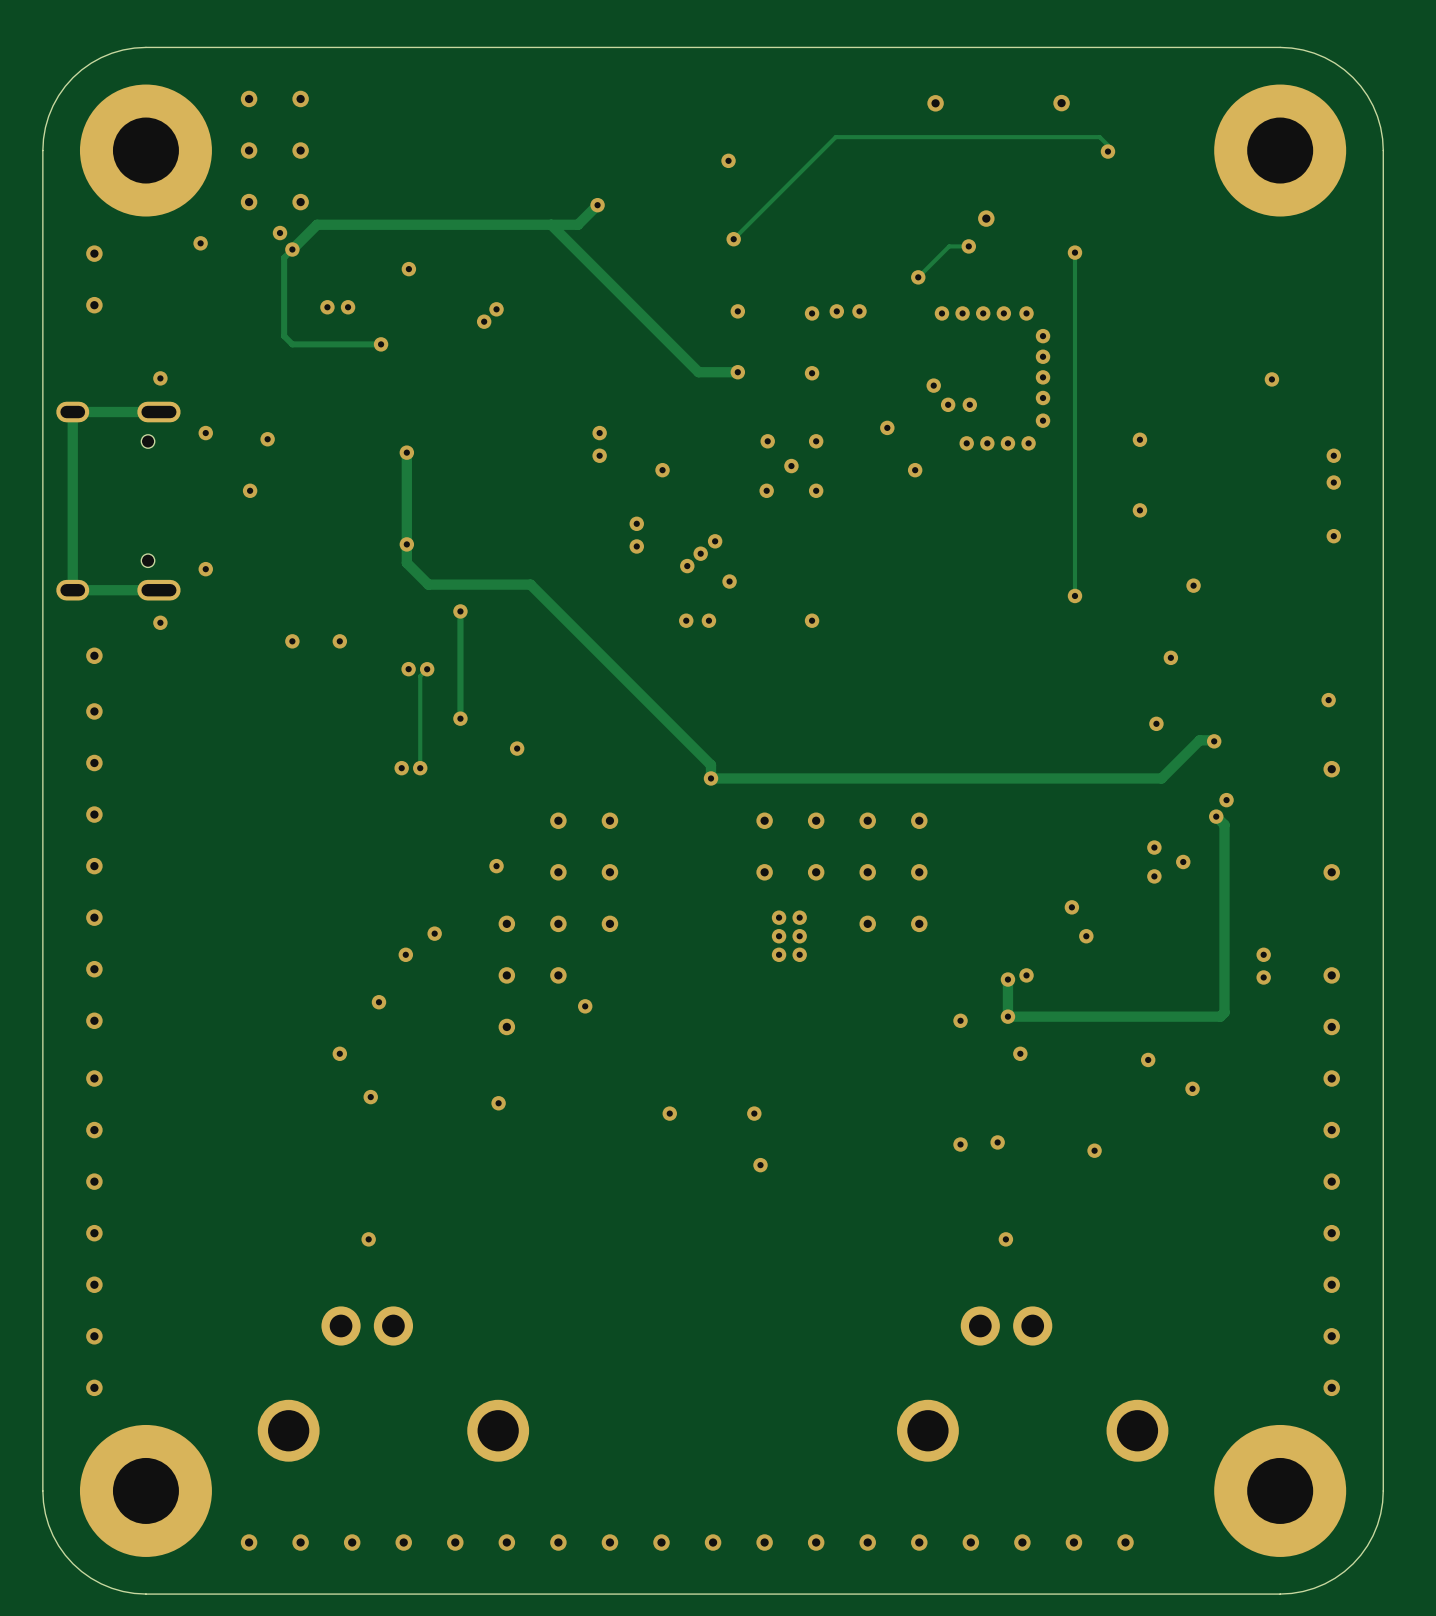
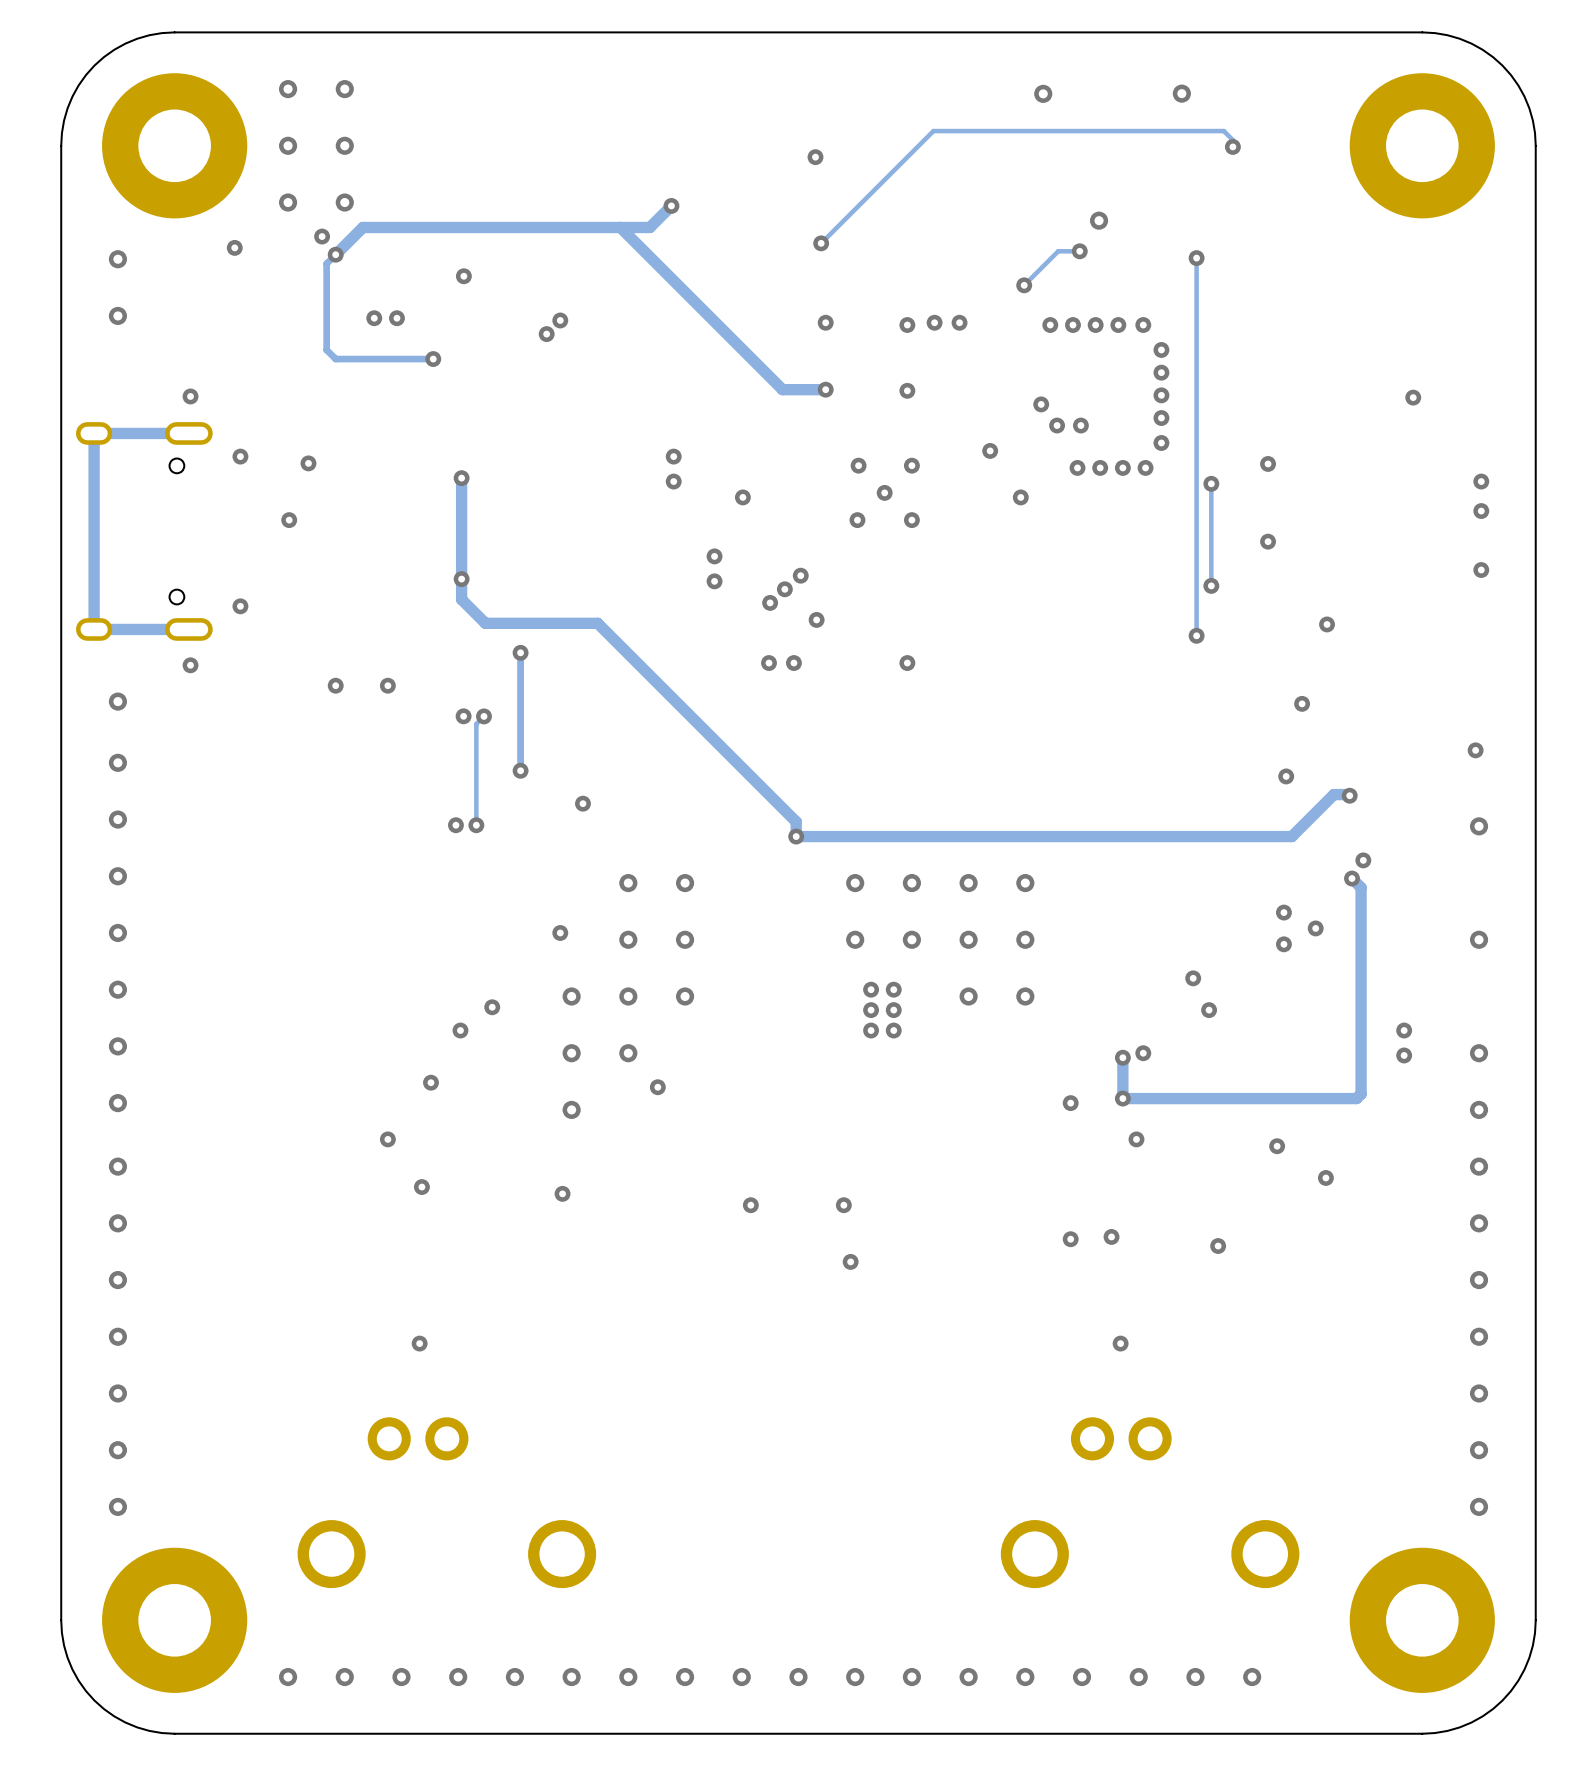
track: none -> (1211, 483) (1211, 585)
via: none -> (1211, 483)
via: none -> (1211, 585)

